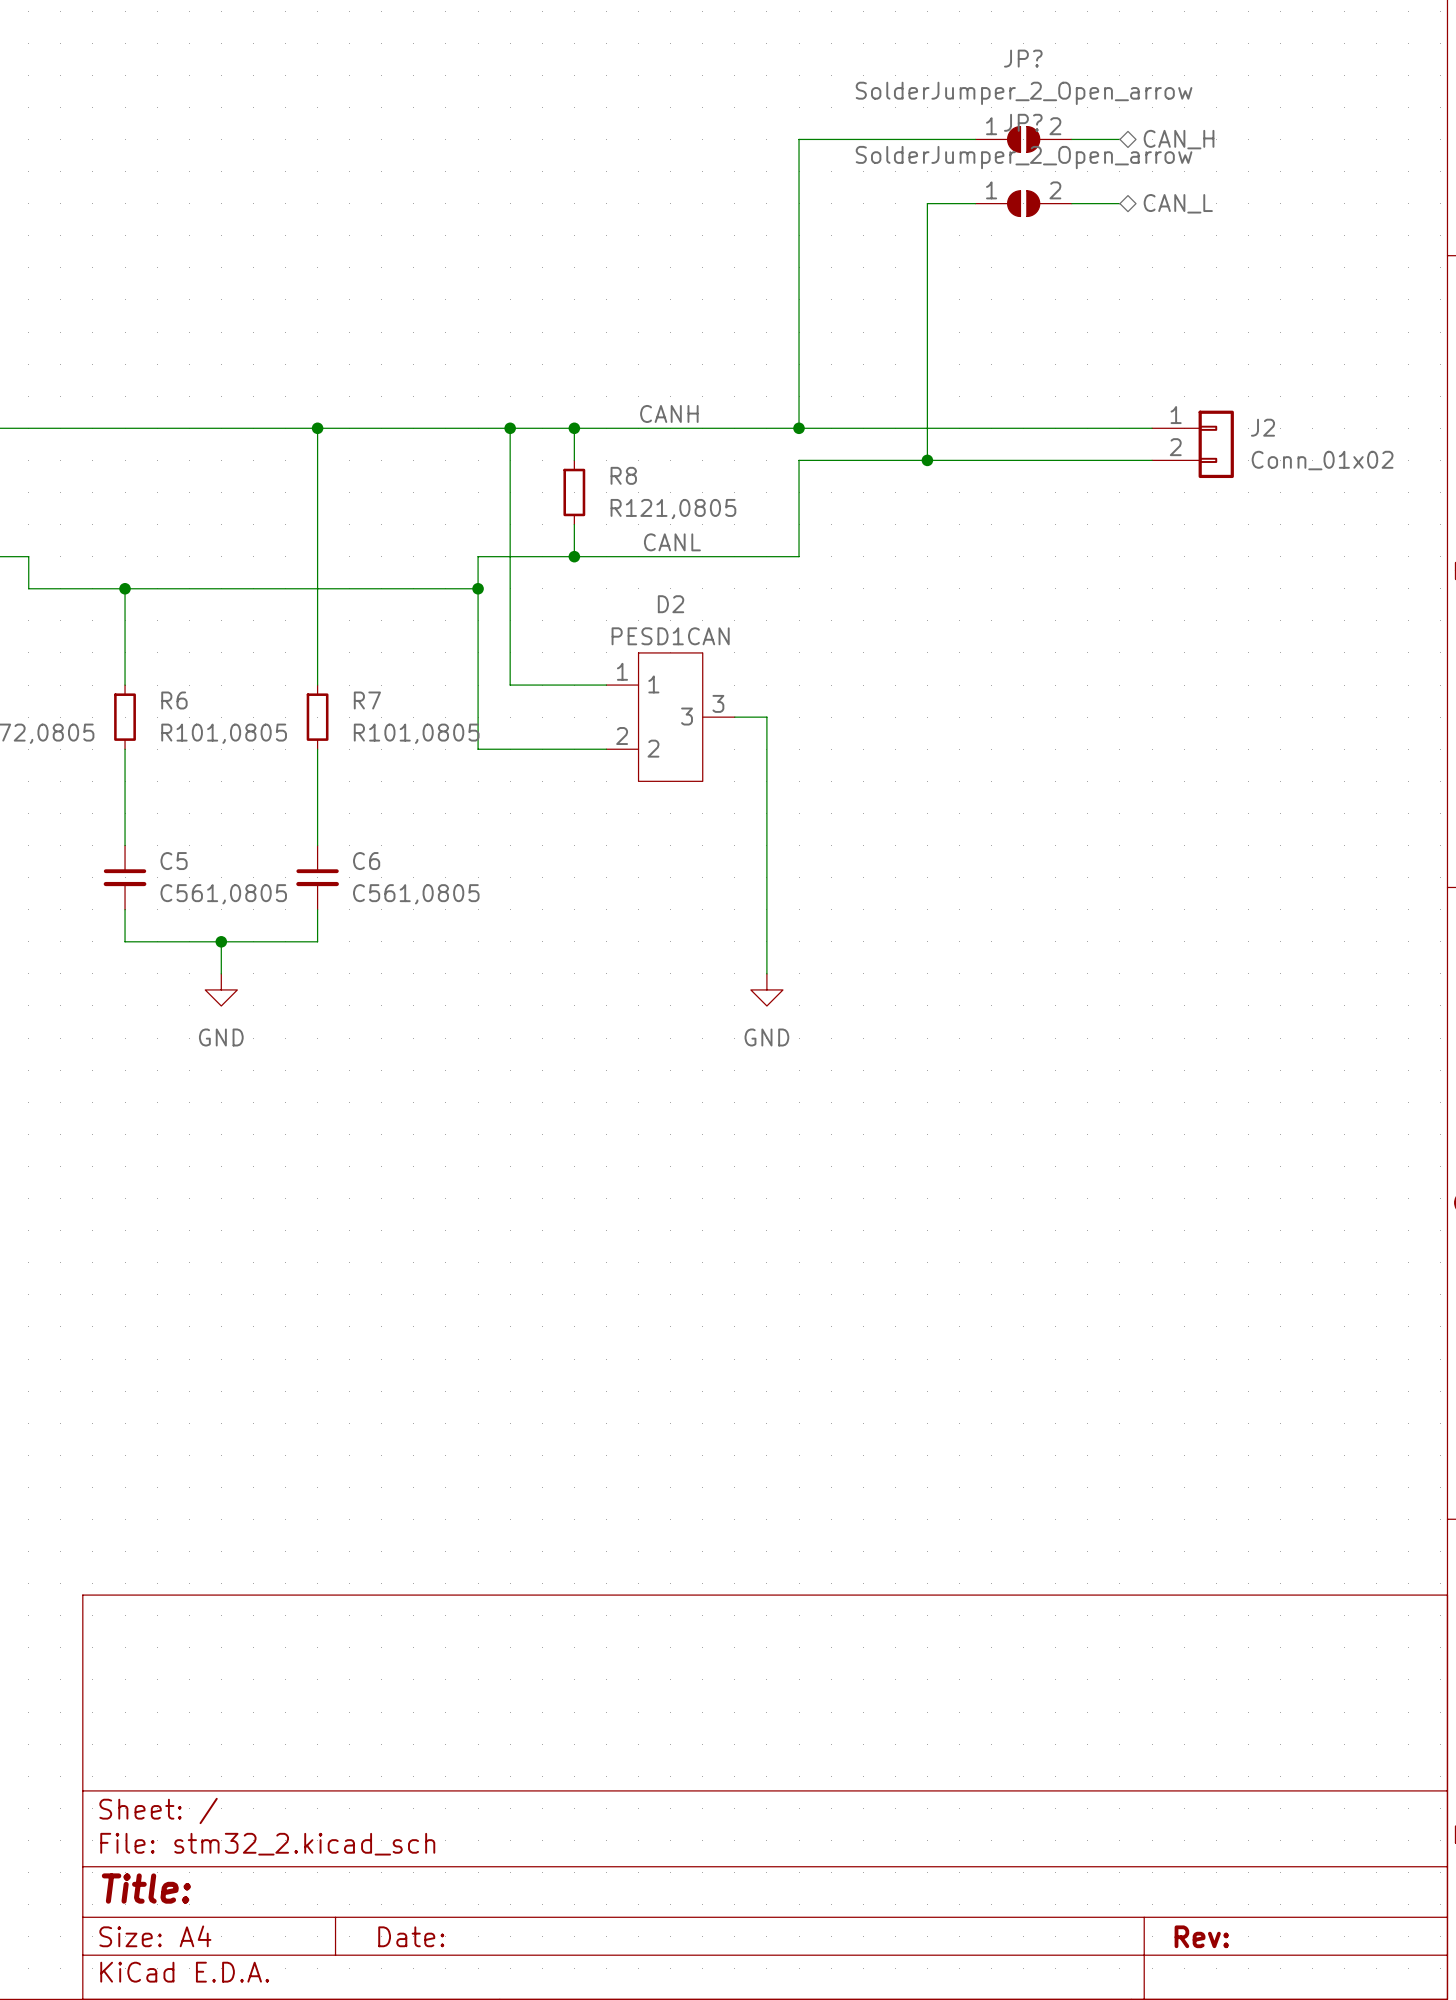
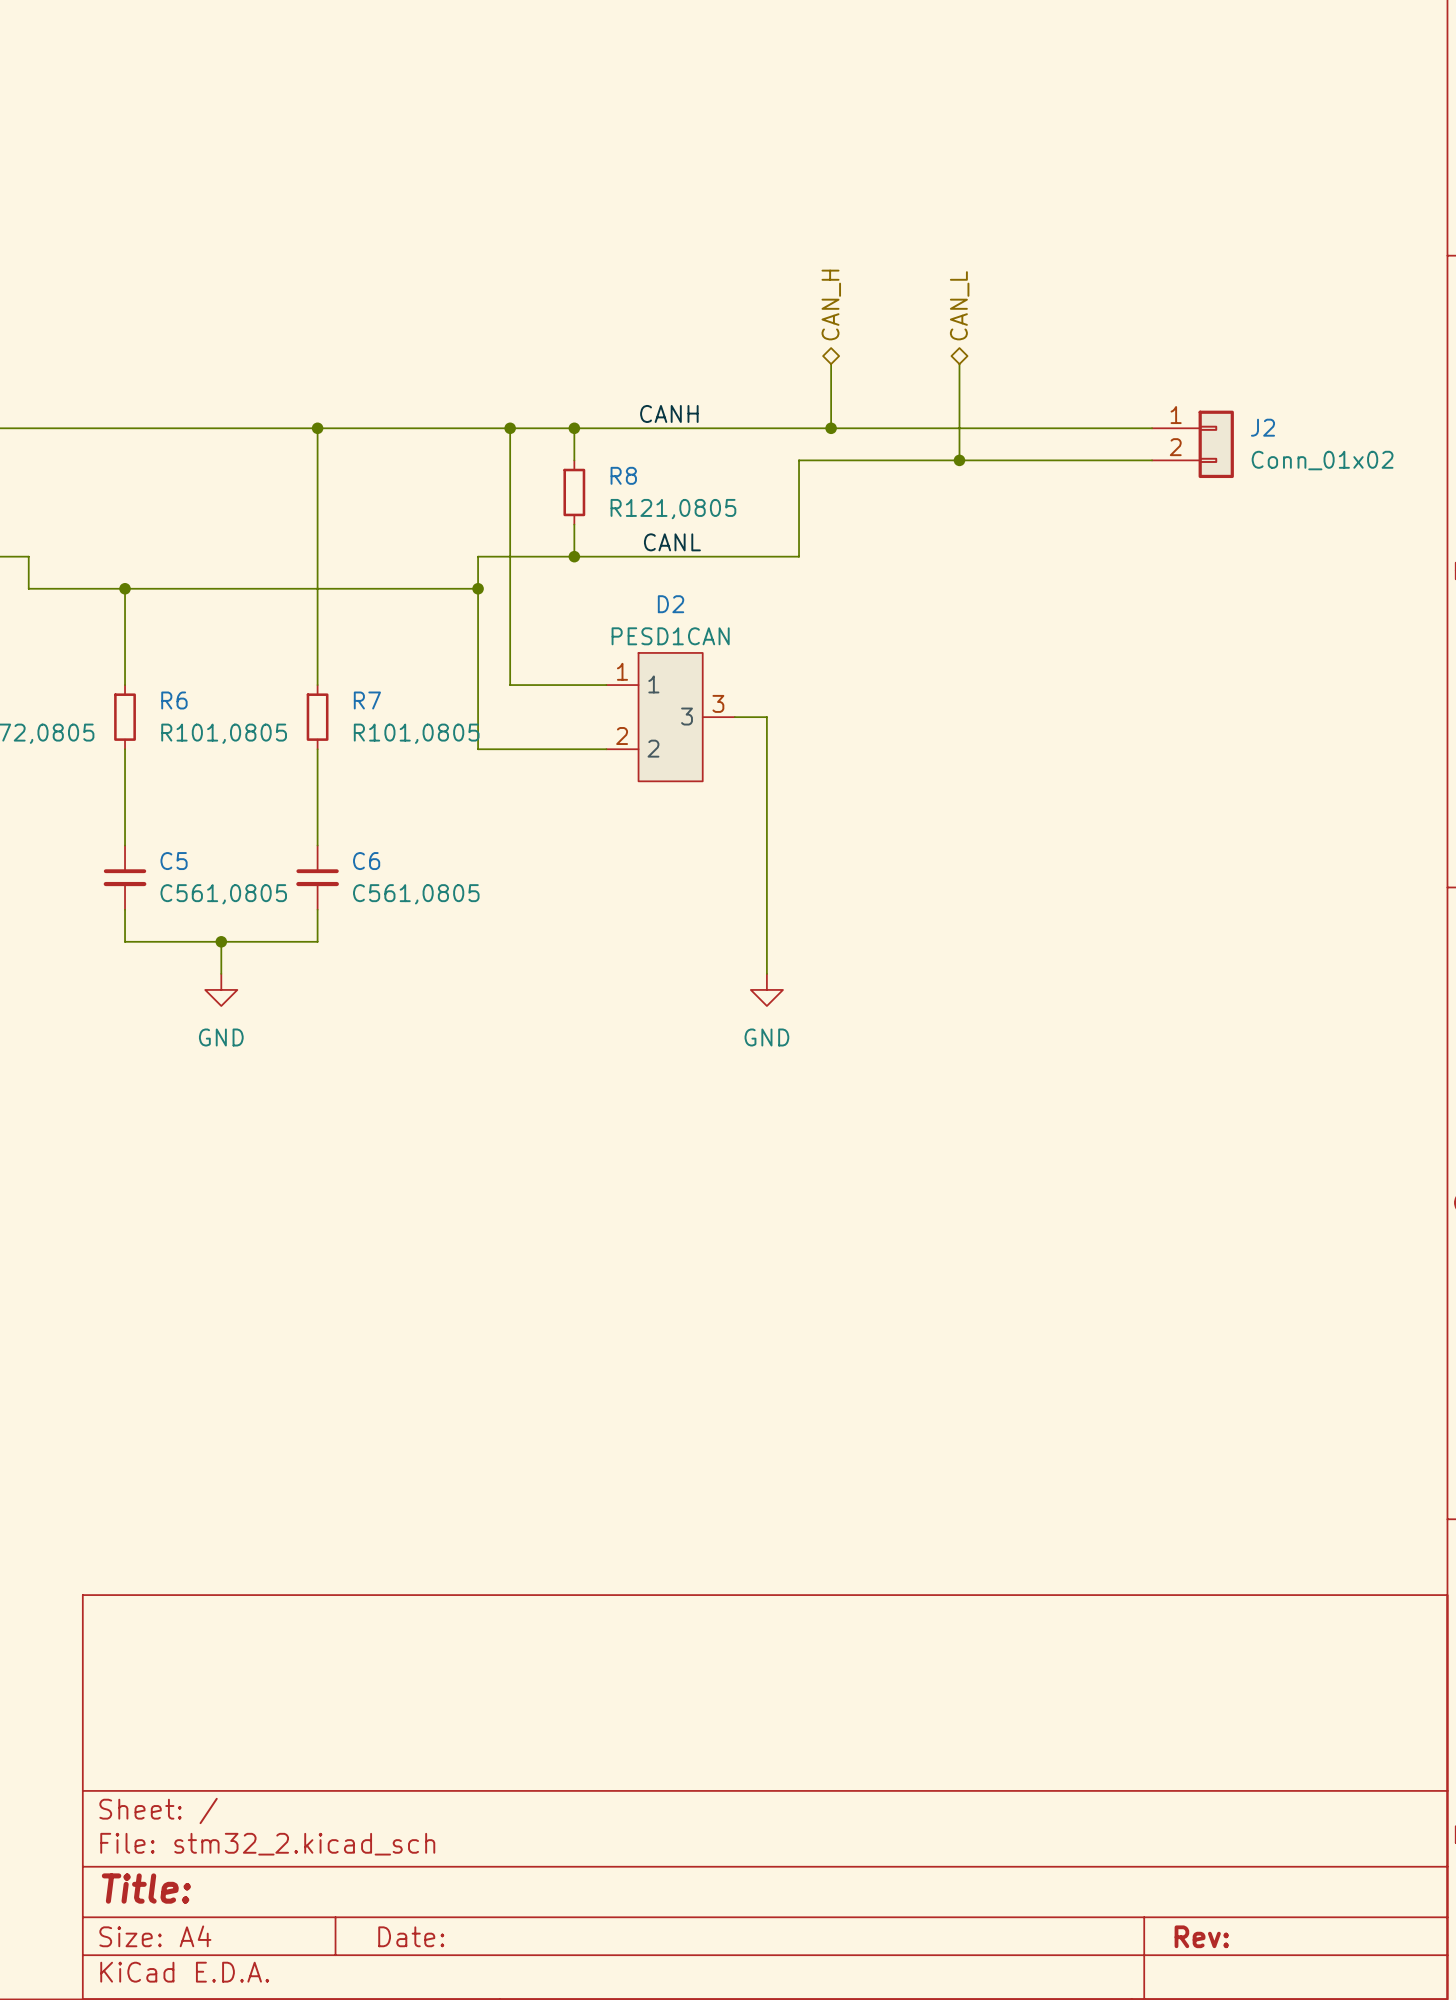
wire: (975, 139) (799, 139) (799, 428) -> none
JP?: SolderJumper_2_Open_arrow (1023, 139) -> none
wire: (1071, 139) (1119, 139) -> none
hierarchical label: CAN_H (1179, 139) -> none
wire: (975, 203) (927, 203) (927, 460) -> none
JP?: SolderJumper_2_Open_arrow (1023, 203) -> none
wire: (1071, 203) (1119, 203) -> none
hierarchical label rotation: 0° (1178, 203) -> 90° counterclockwise (959, 305)
hierarchical label position: CAN_L (1178, 203) -> CAN_L (959, 305)
hierarchical label: none -> CAN_H (831, 305)
wire: none -> (831, 364) (831, 428)
wire: none -> (959, 364) (959, 460)
junction position: (799, 428) -> (831, 428)
junction position: (927, 460) -> (959, 460)

